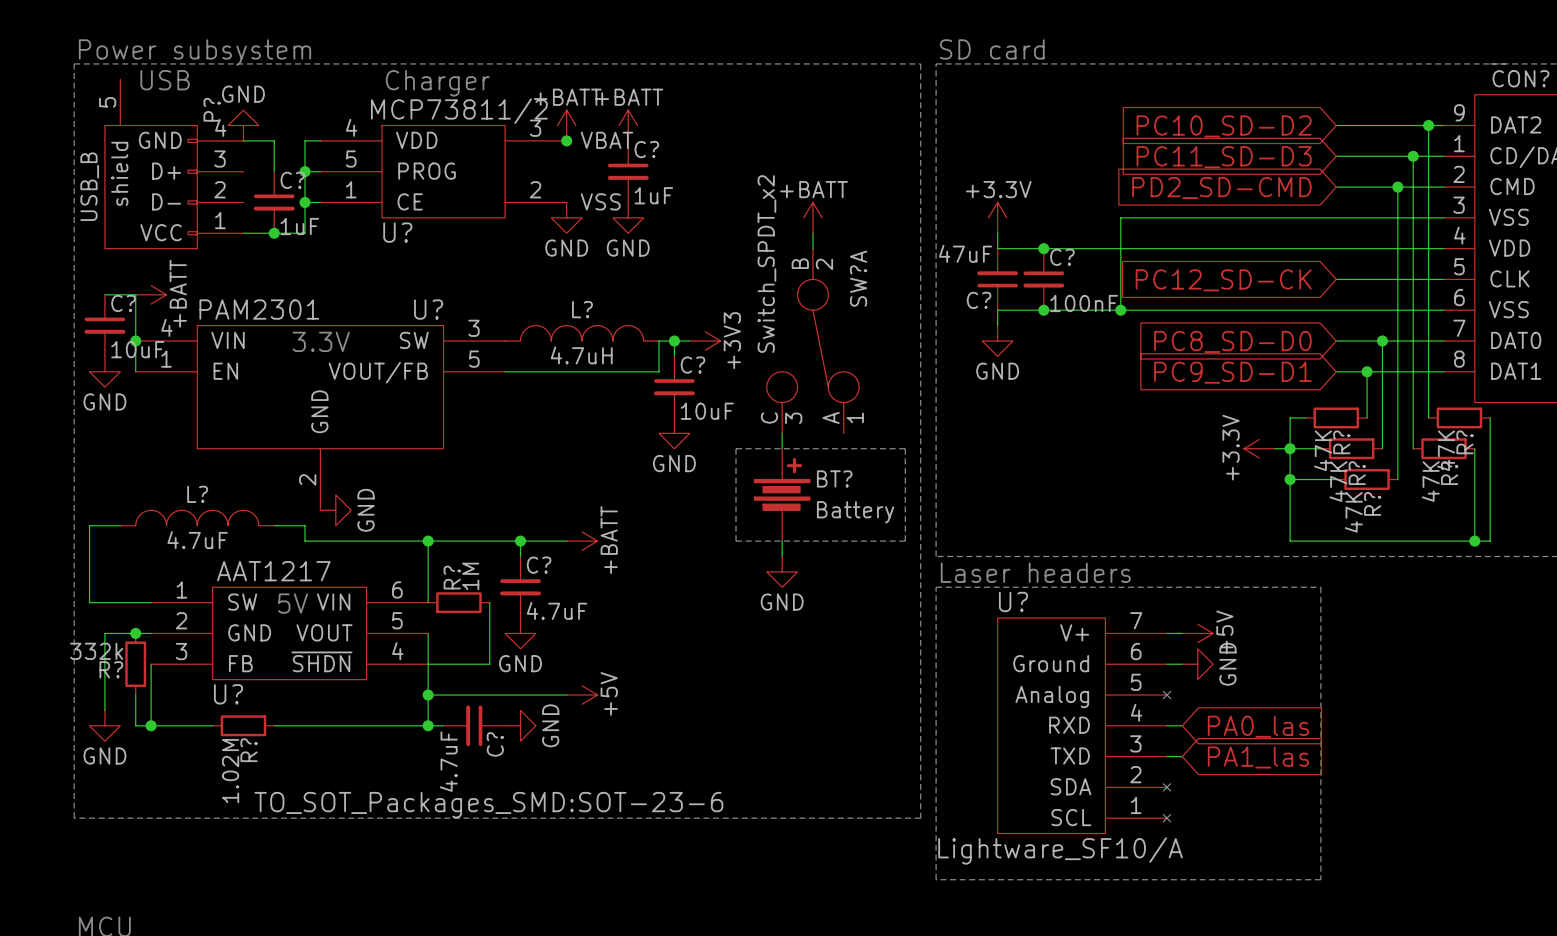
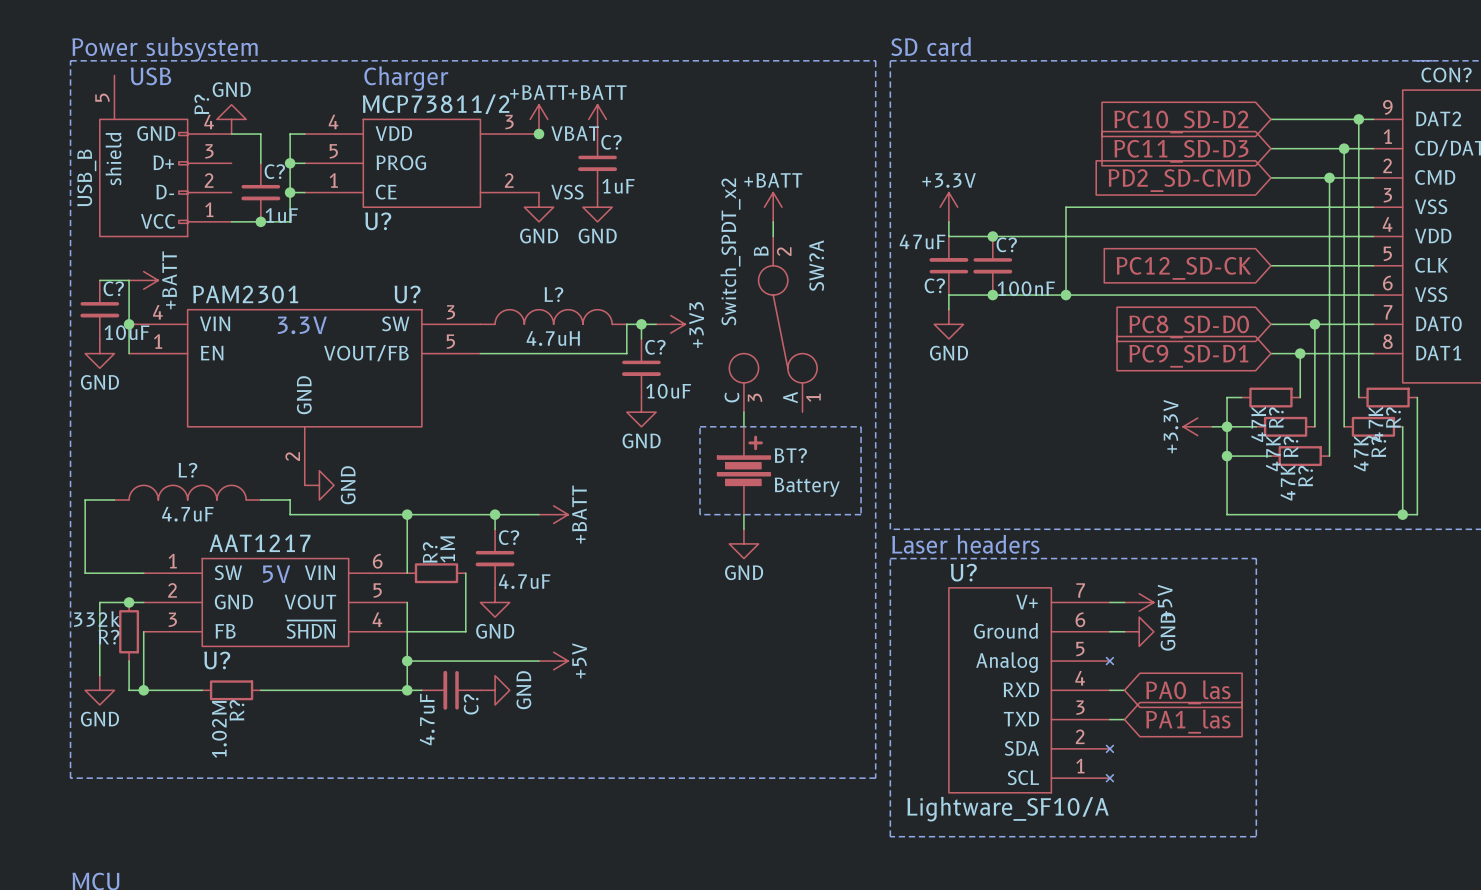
U? text: TO_SOT_Packages_SMD:SOT-23-6 (488, 805) -> none

